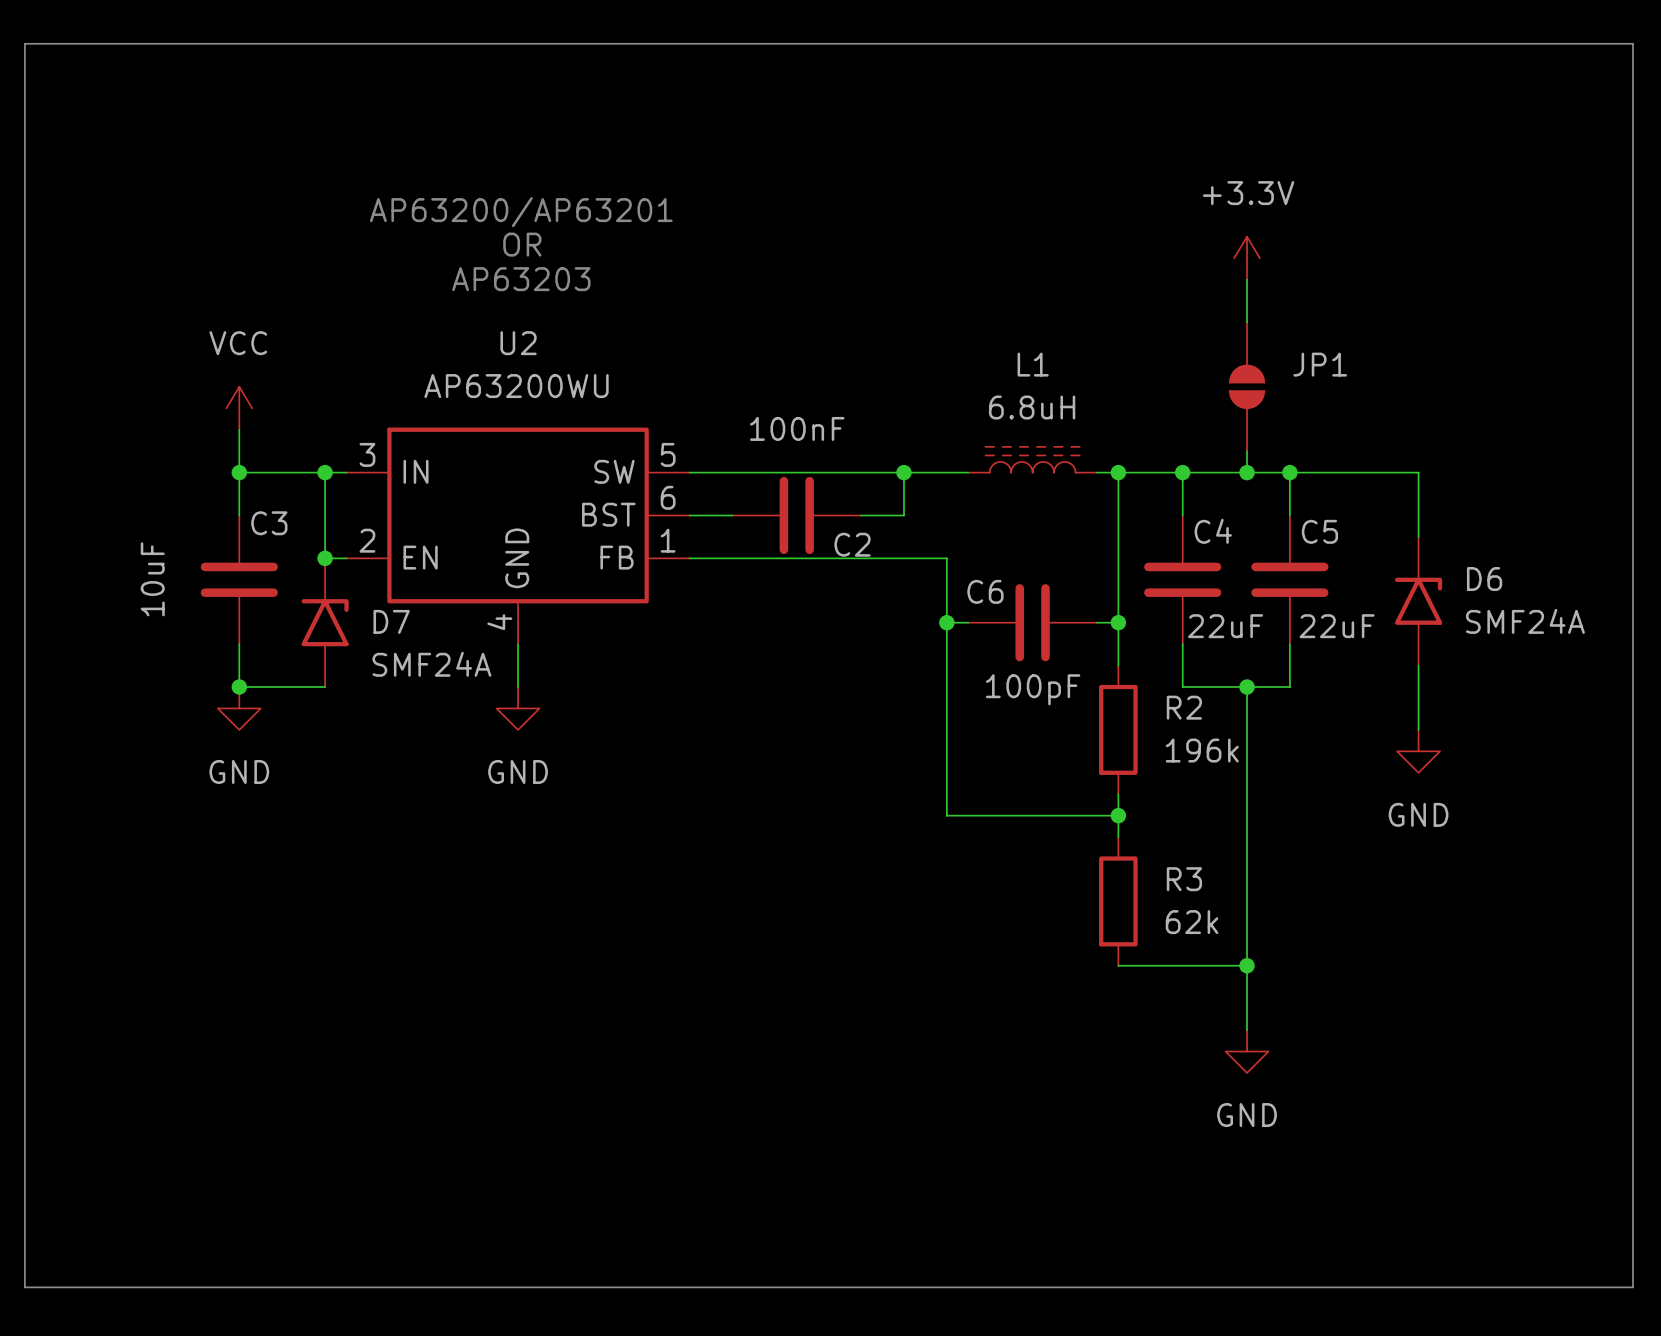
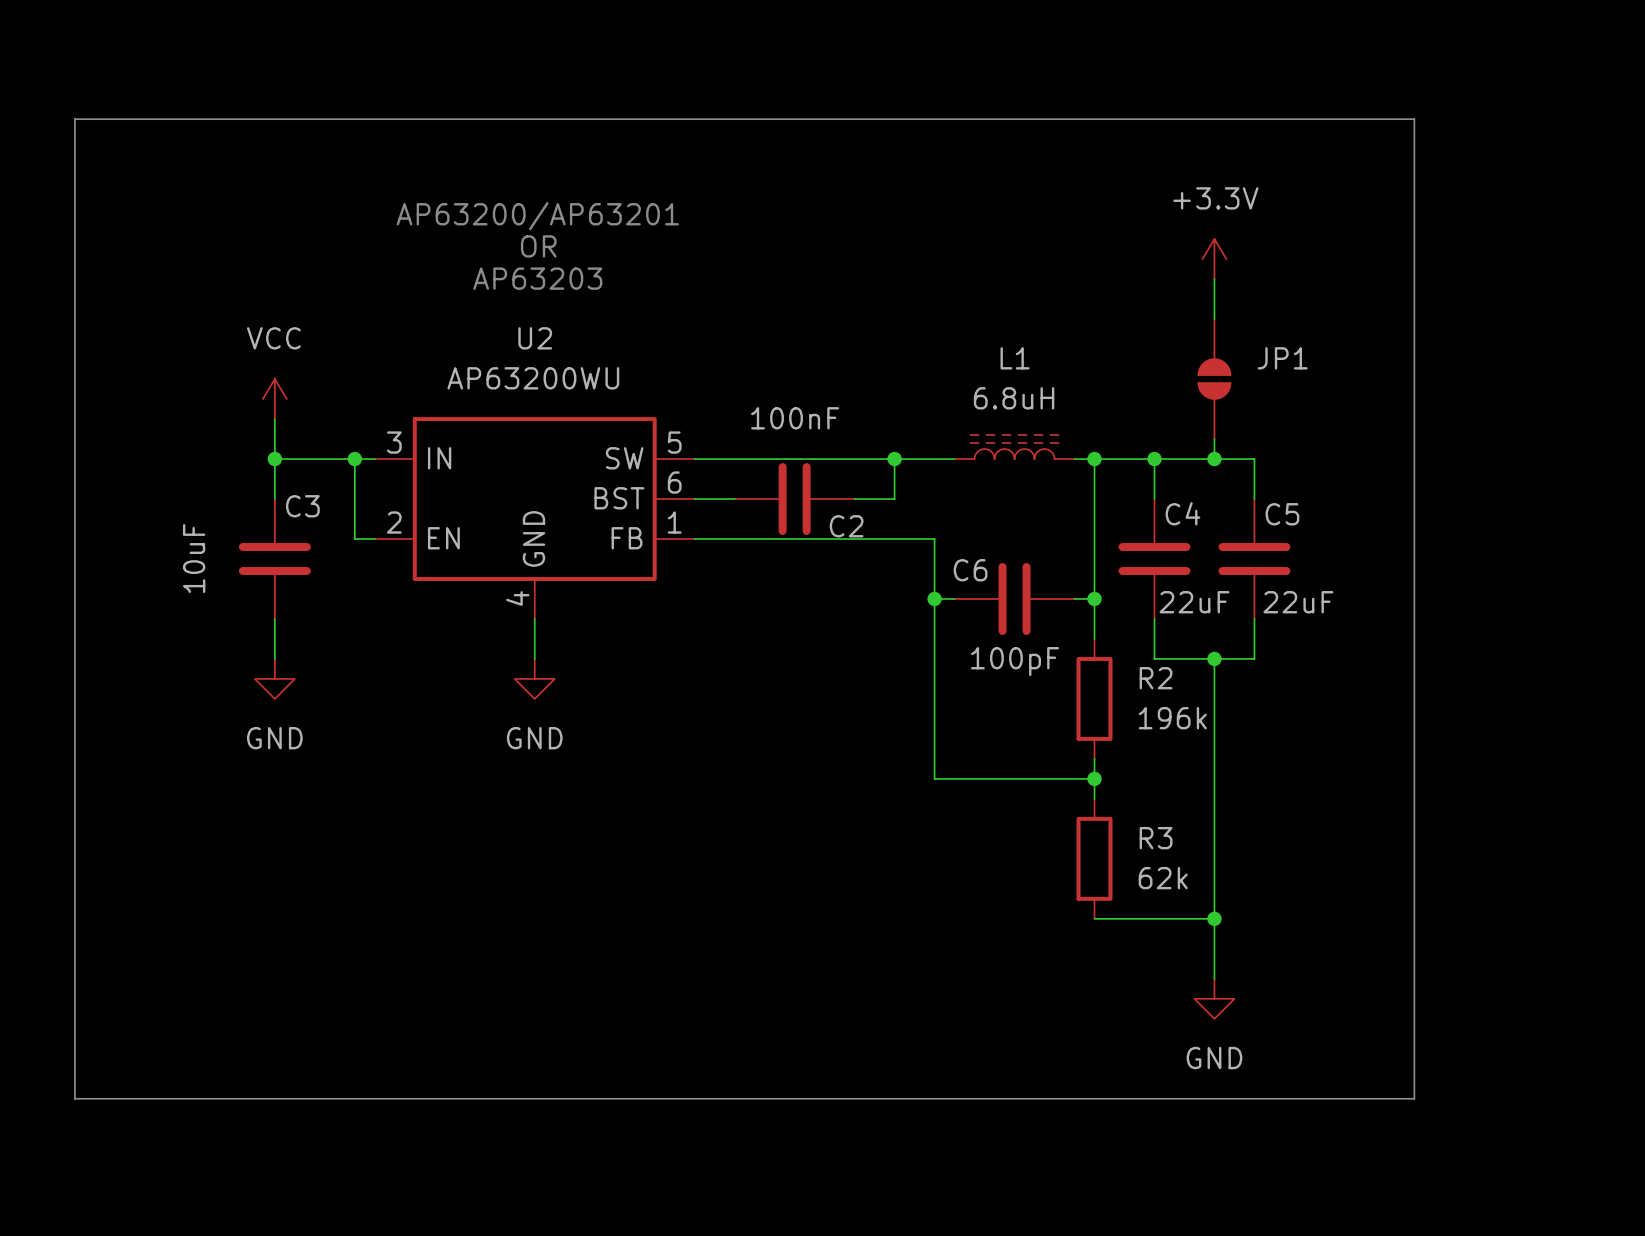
line: (24, 108) (24, 43) (1632, 43) (1632, 1287) (24, 1287) (24, 1158) -> (74, 119) (1414, 119) (1414, 1098) (74, 1098)
wire: (1289, 472) (1418, 472) (1418, 536) -> none
junction: (1289, 472) -> none
junction: (325, 558) -> none
D6: SMF24A (1418, 601) -> none
D7: SMF24A (325, 622) -> none
wire: (1418, 665) (1418, 729) -> none
wire: (239, 687) (325, 687) -> none
junction: (239, 687) -> none
power symbol: GND (1418, 751) -> none

